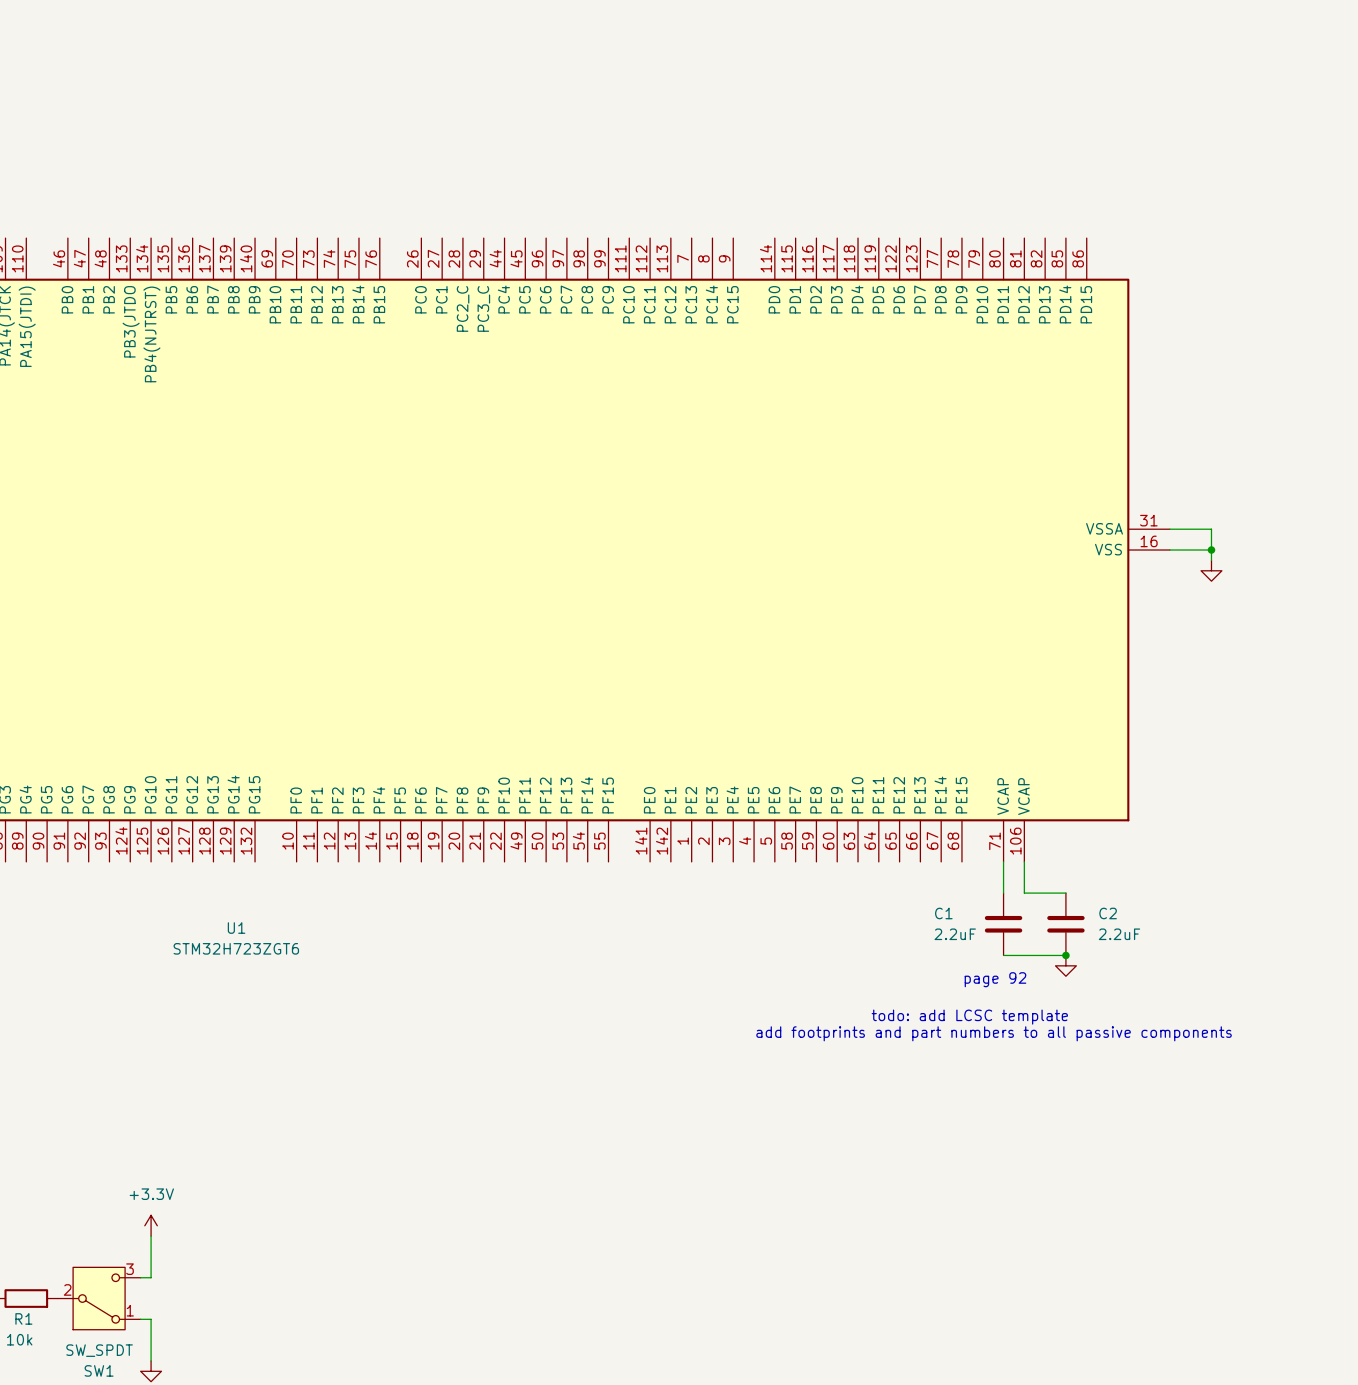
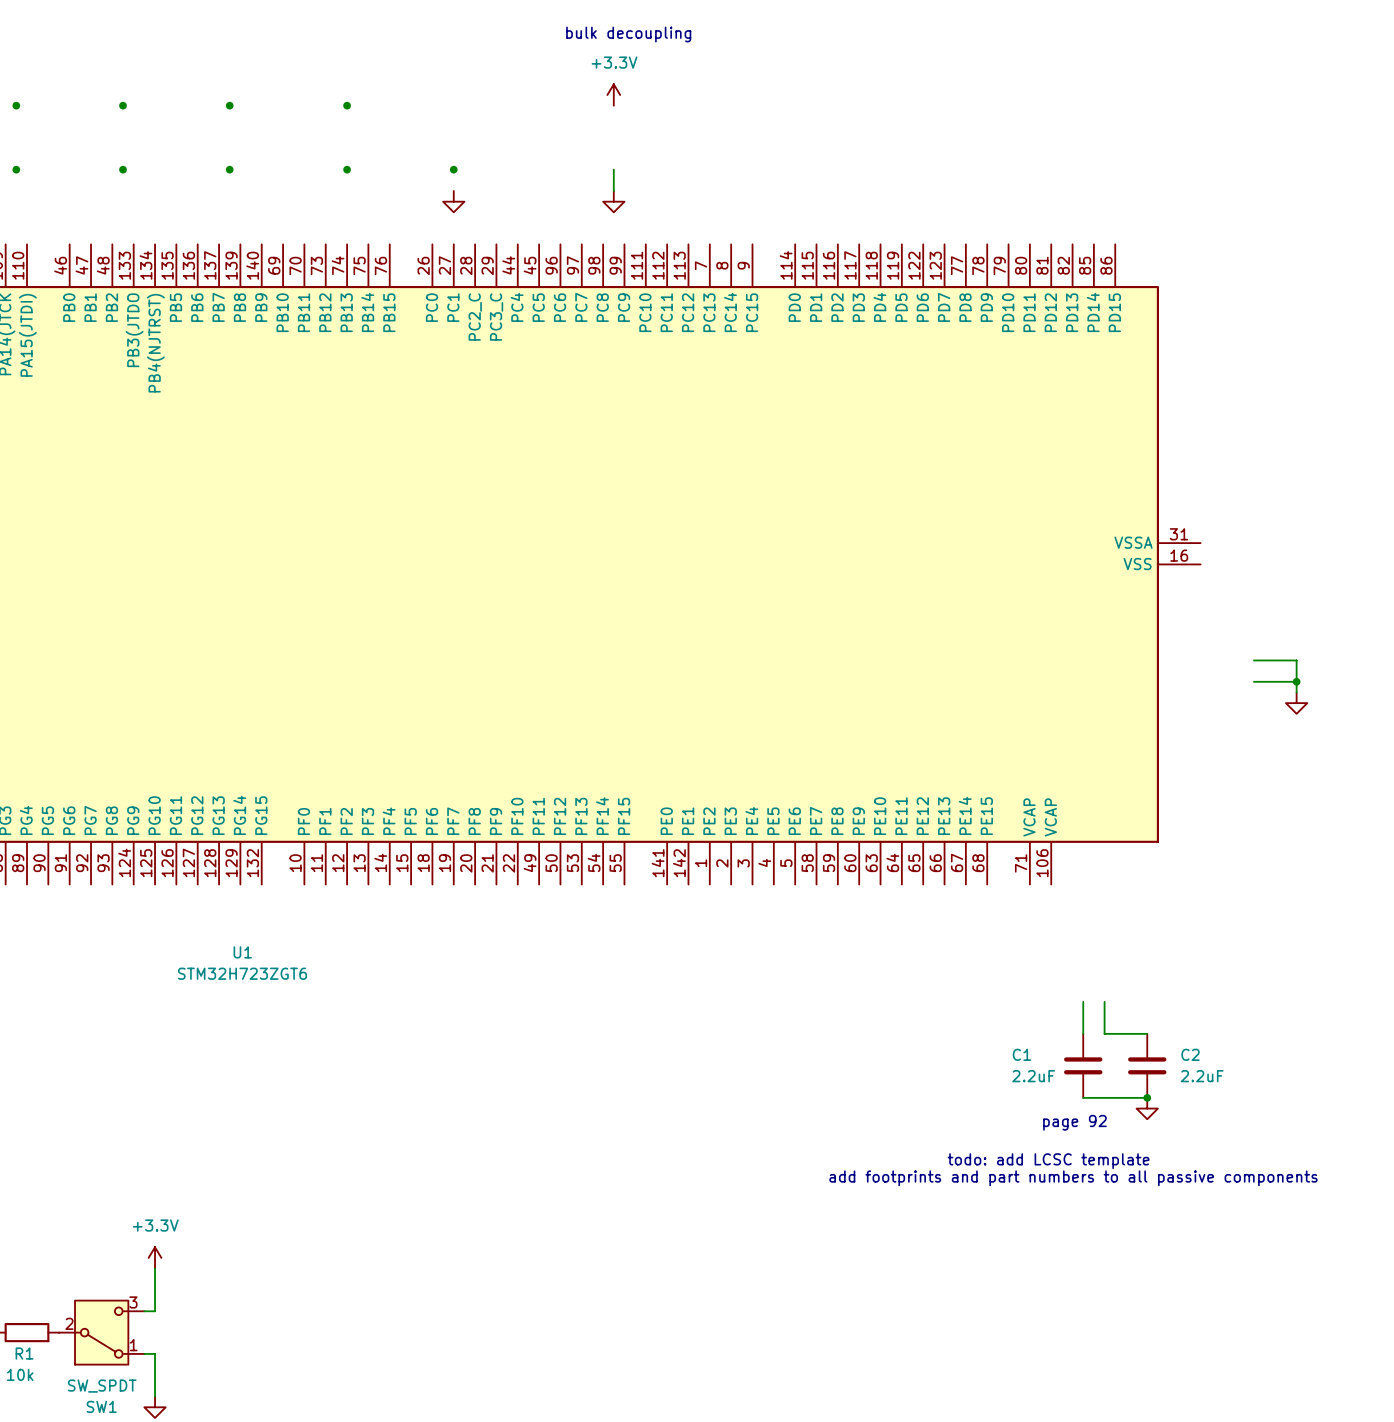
text: none -> bulk decoupling (628, 34)
power symbol: none -> +3.3V (613, 94)
junction: none -> (16, 105)
junction: none -> (123, 105)
junction: none -> (229, 105)
junction: none -> (347, 105)
junction: none -> (16, 169)
junction: none -> (123, 169)
junction: none -> (229, 169)
junction: none -> (347, 169)
junction: none -> (453, 169)
wire: none -> (613, 169) (613, 191)
power symbol: none -> (453, 201)
power symbol: none -> (613, 201)
wire: (1169, 529) (1211, 529) (1211, 560) -> (1253, 660) (1296, 660) (1296, 692)
wire: (1169, 550) (1211, 550) -> (1253, 681) (1296, 681)
junction: (1211, 550) -> none
power symbol position: (1211, 570) -> (1296, 703)
junction: none -> (1296, 681)
wire: (1003, 861) (1003, 893) -> (1083, 1001) (1083, 1033)
wire: (1024, 861) (1024, 893) (1065, 893) -> (1104, 1001) (1104, 1033) (1147, 1033)
C1 position: (1003, 924) -> (1083, 1065)
C2 position: (1065, 924) -> (1147, 1065)
wire: (1003, 955) (1065, 955) -> (1083, 1097) (1147, 1097)
junction: (1065, 955) -> none
power symbol position: (1065, 965) -> (1147, 1108)
text position: page 92 (995, 979) -> page 92 (1074, 1122)
text position: todo: add LCSC template (969, 1017) -> todo: add LCSC template (1048, 1161)
text position: add footprints and part numbers to all passive components (994, 1033) -> add footprints and part numbers to all passive components (1073, 1178)
junction: none -> (1147, 1097)

